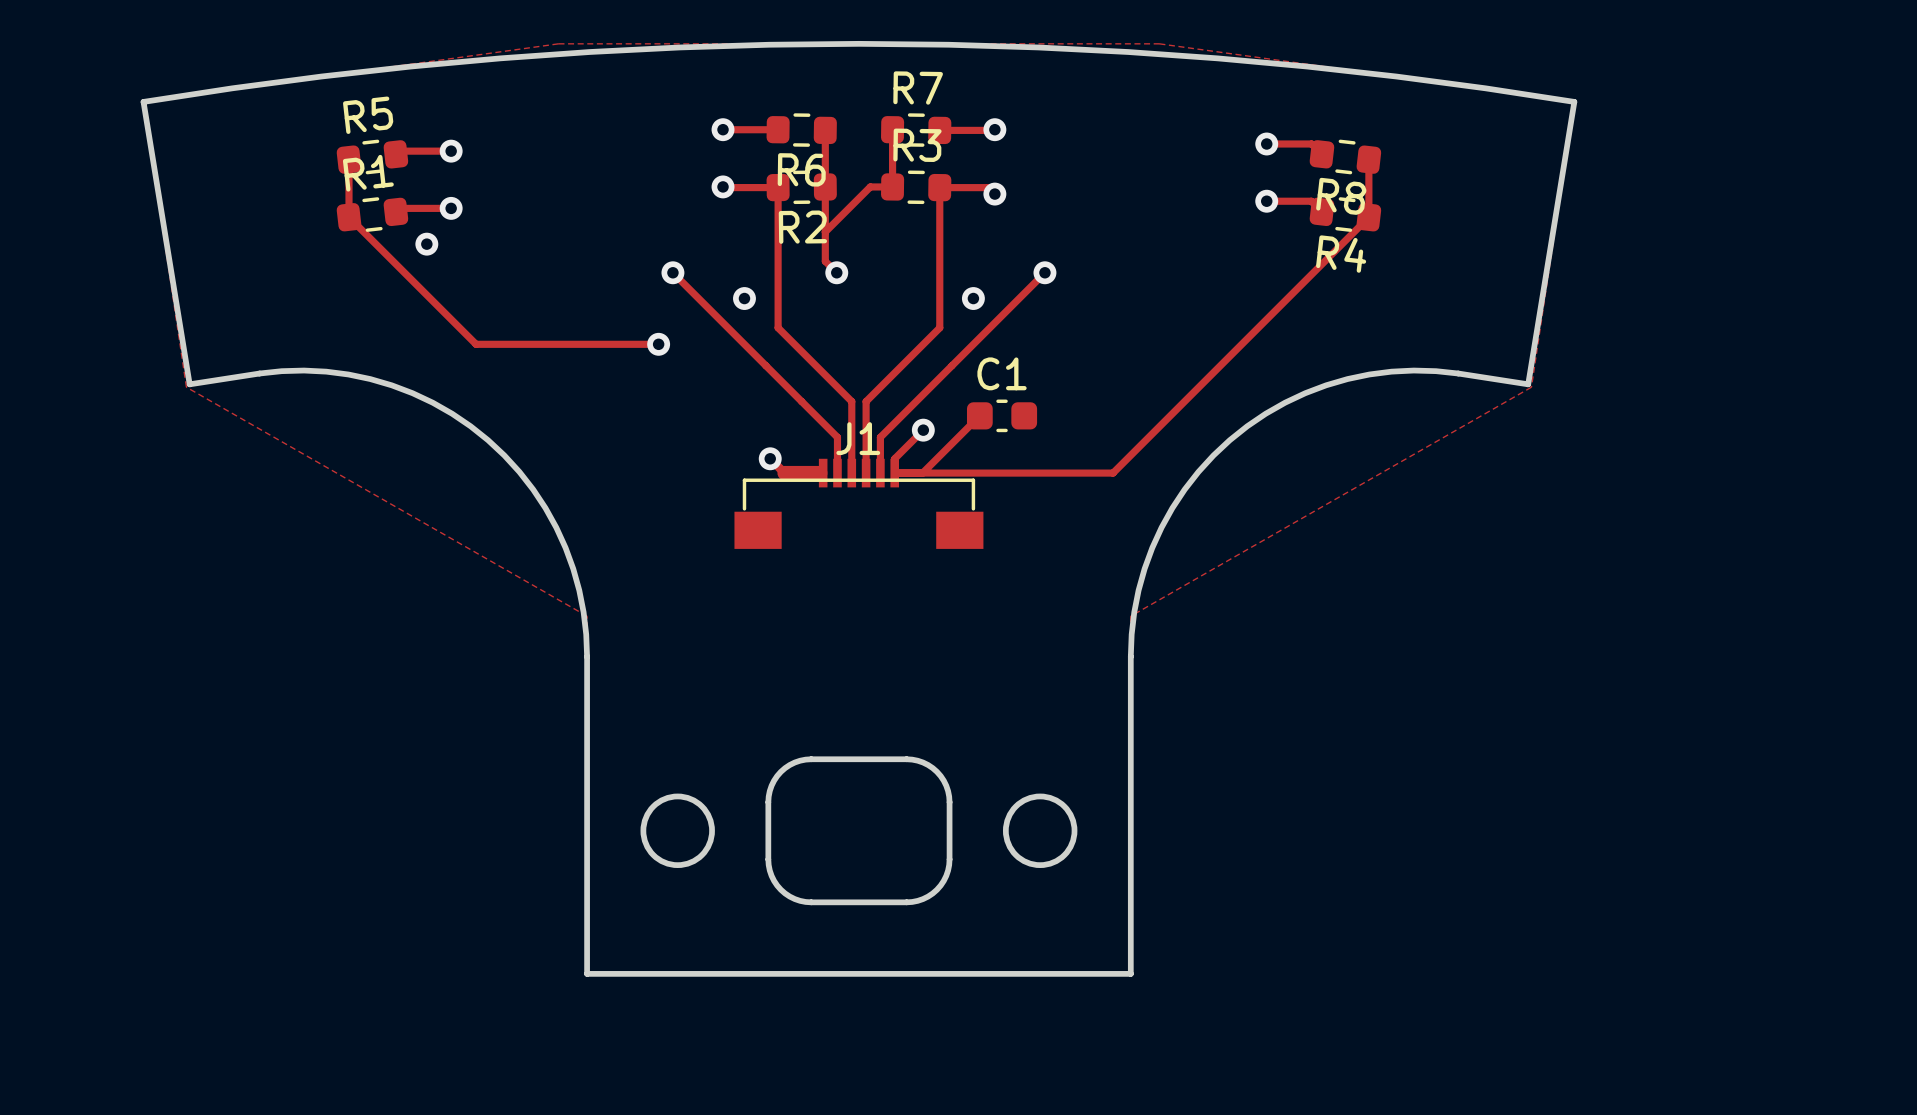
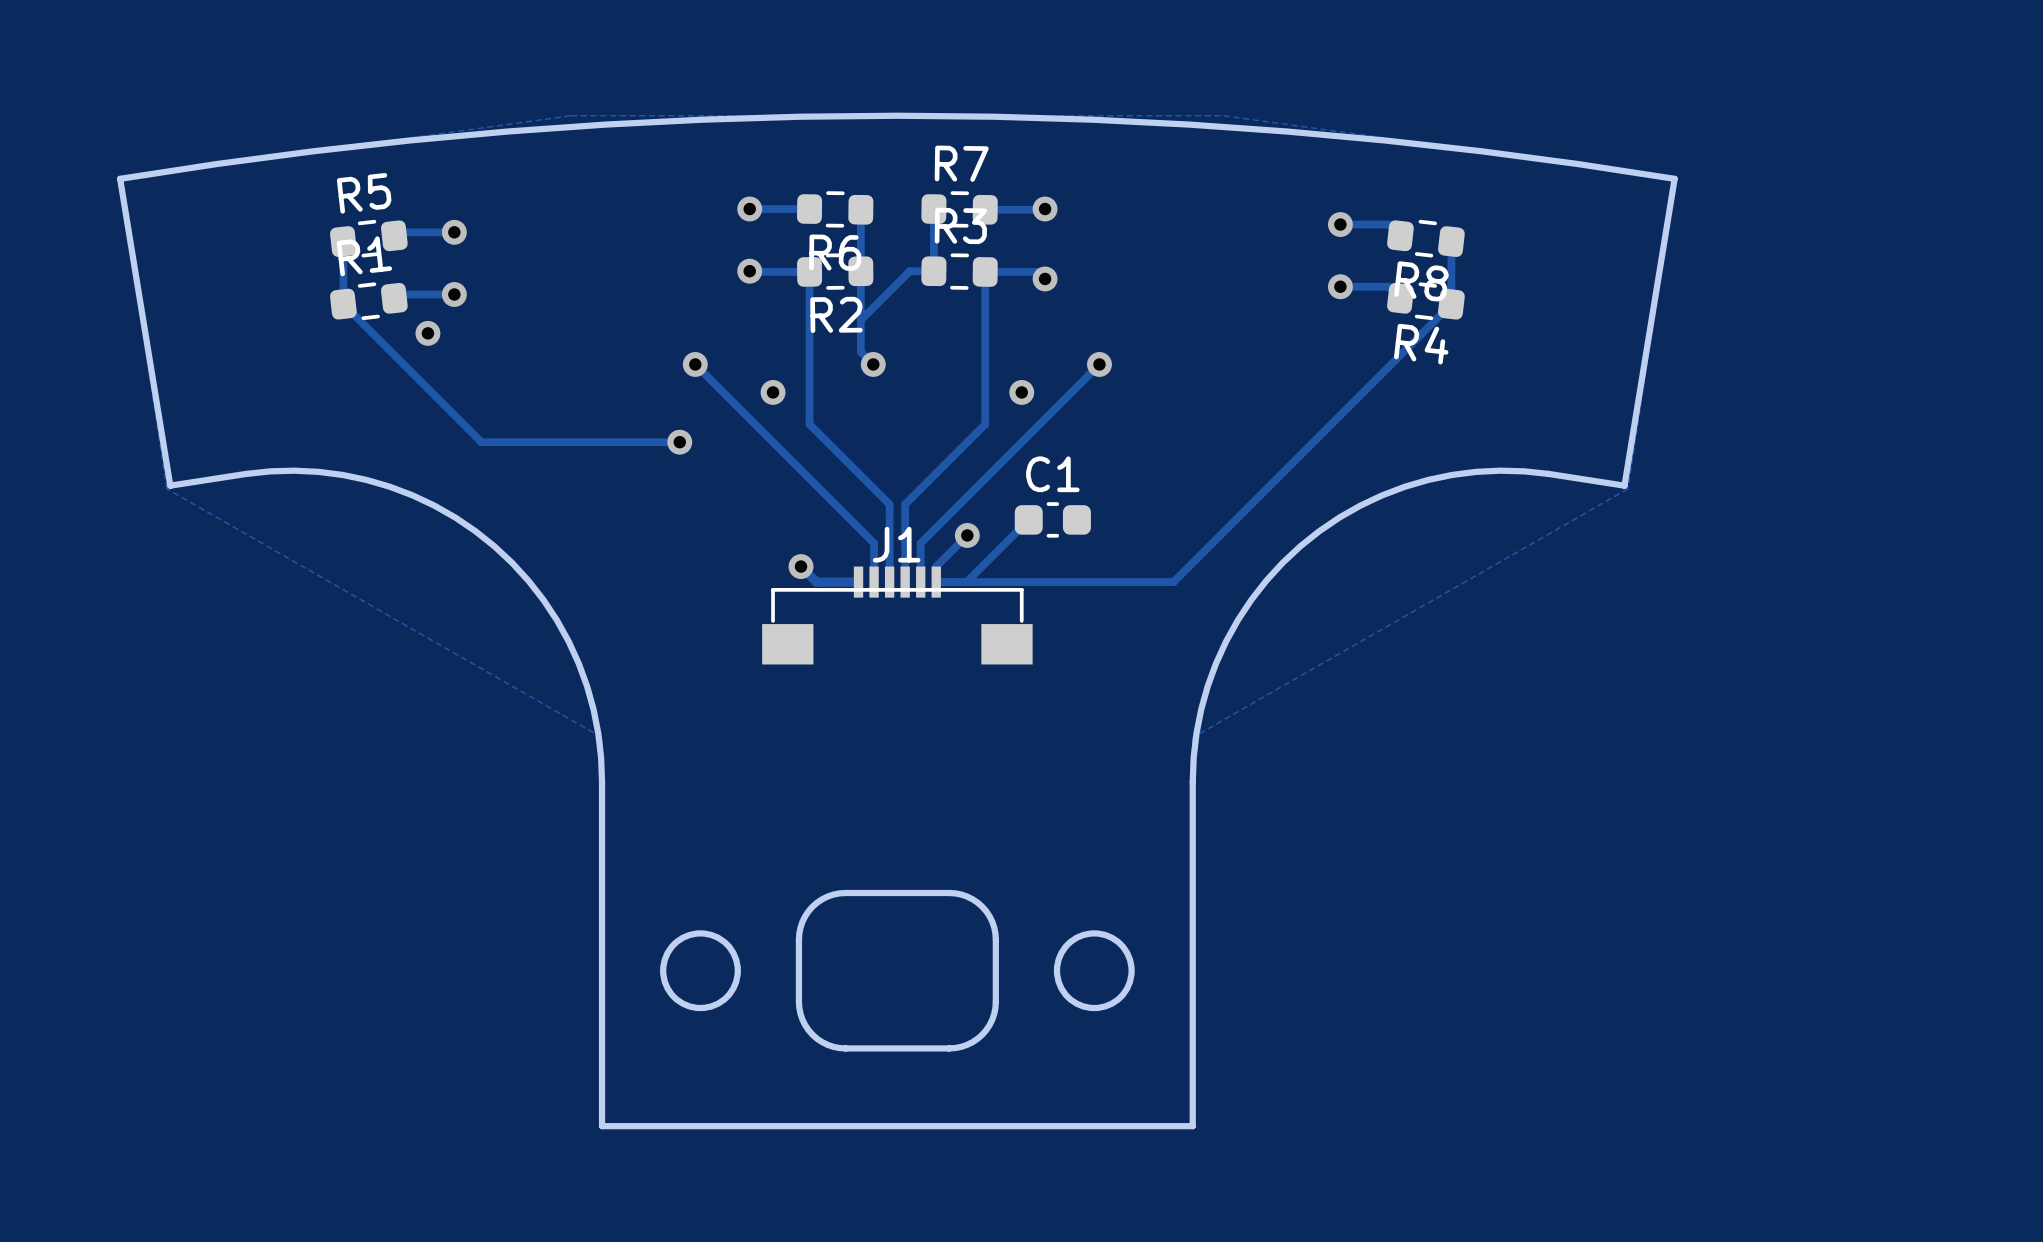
track width: thick (784, 473) (820, 473) -> thin (816, 582) (855, 582)

